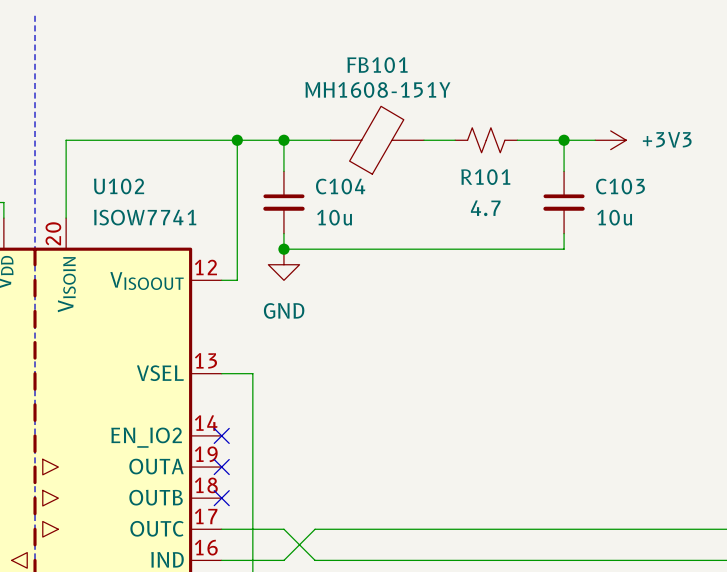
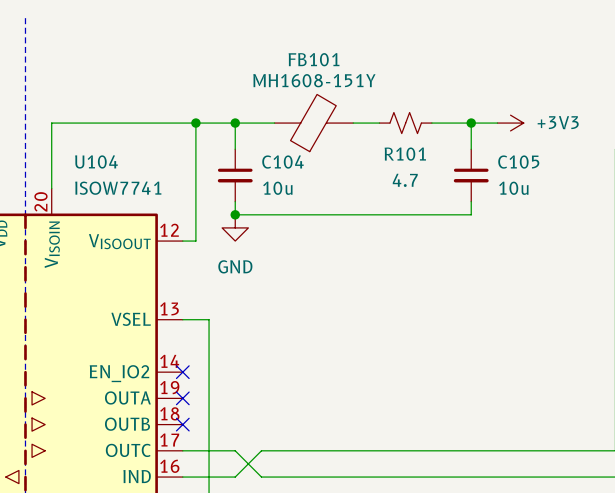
U102 name: U102 (119, 186) -> U104 (96, 161)
C103 name: C103 (620, 186) -> C105 (518, 162)

